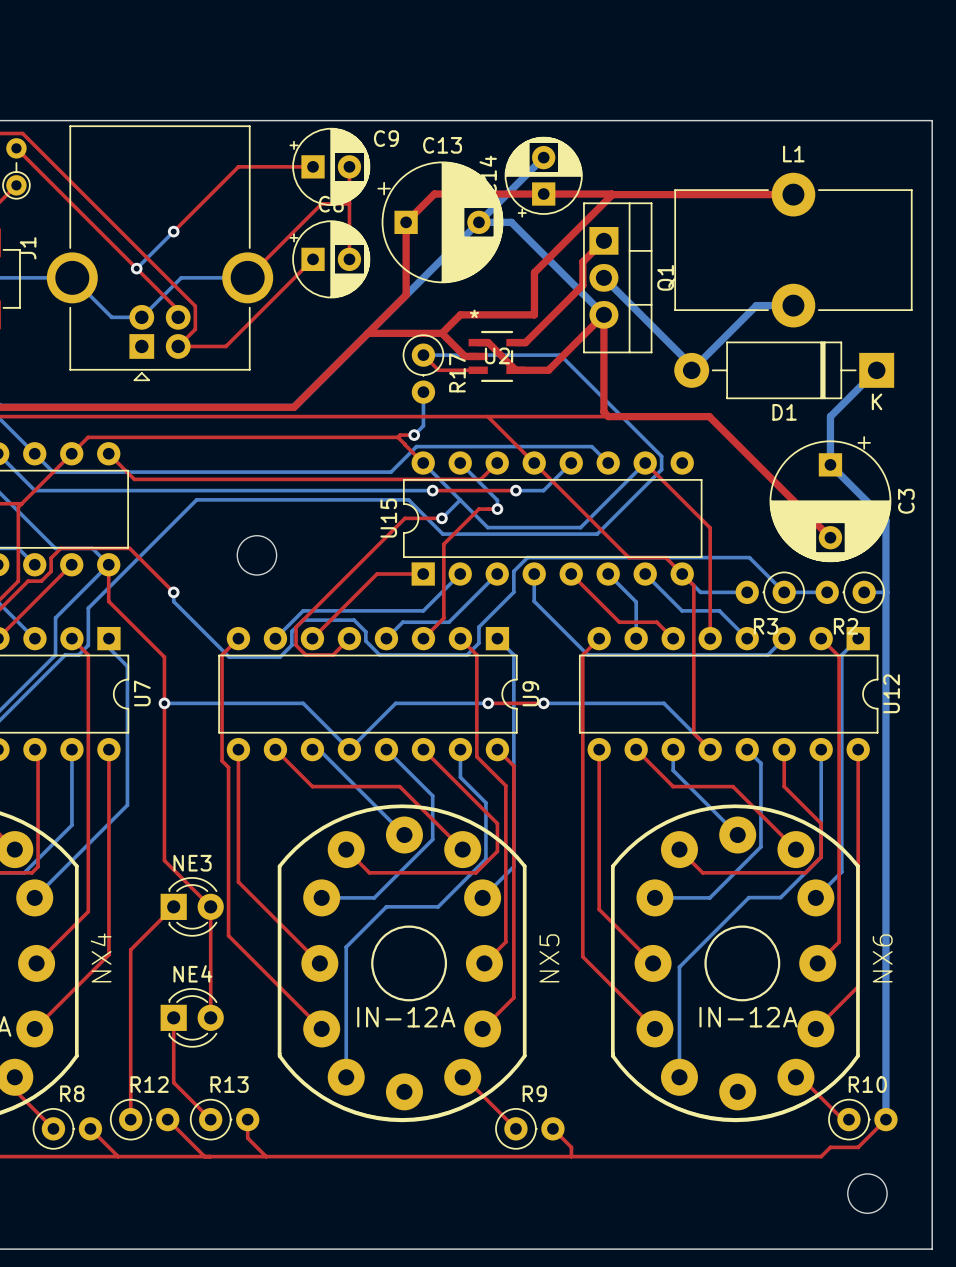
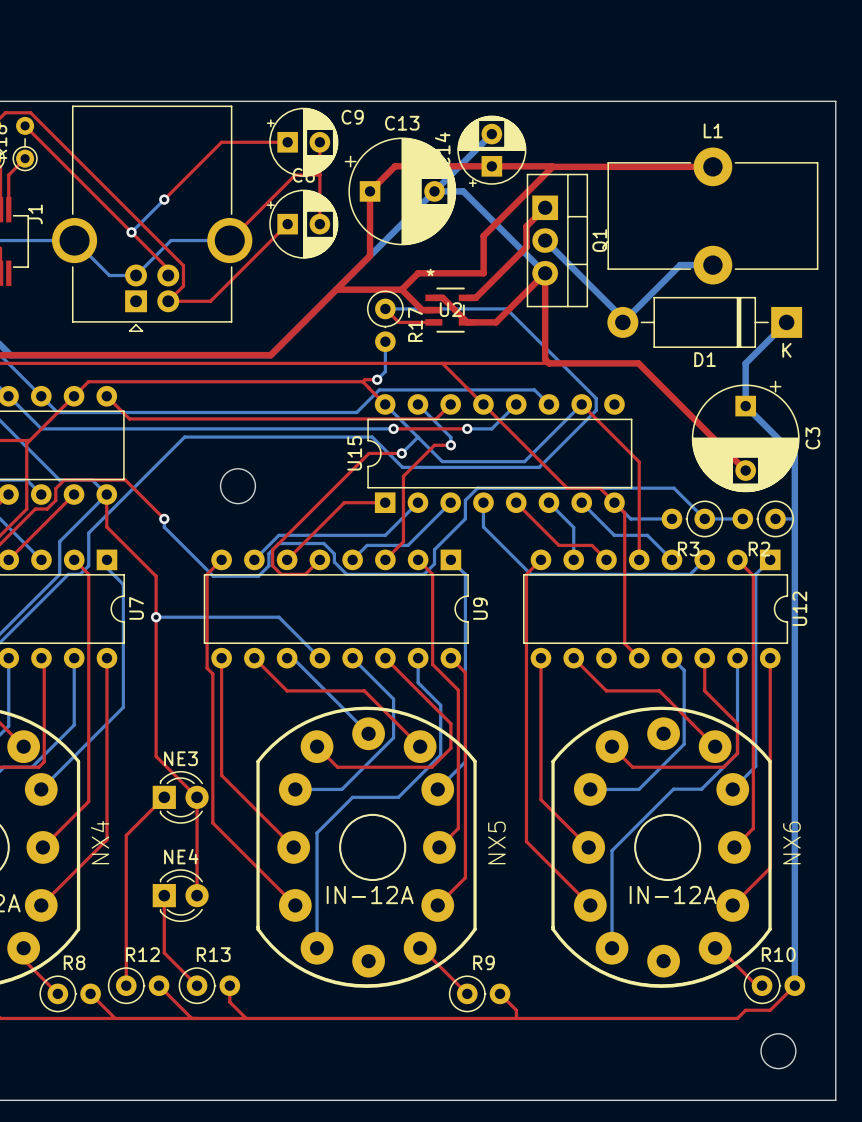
top track: (488, 703) (543, 703) -> none
bottom track: (488, 703) (395, 703) (349, 749) -> none
via: (488, 703) -> none
bottom track: (543, 703) (663, 703) (710, 749) -> none
via: (543, 703) -> none
bottom track: (673, 749) (673, 770) (737, 835) -> none

